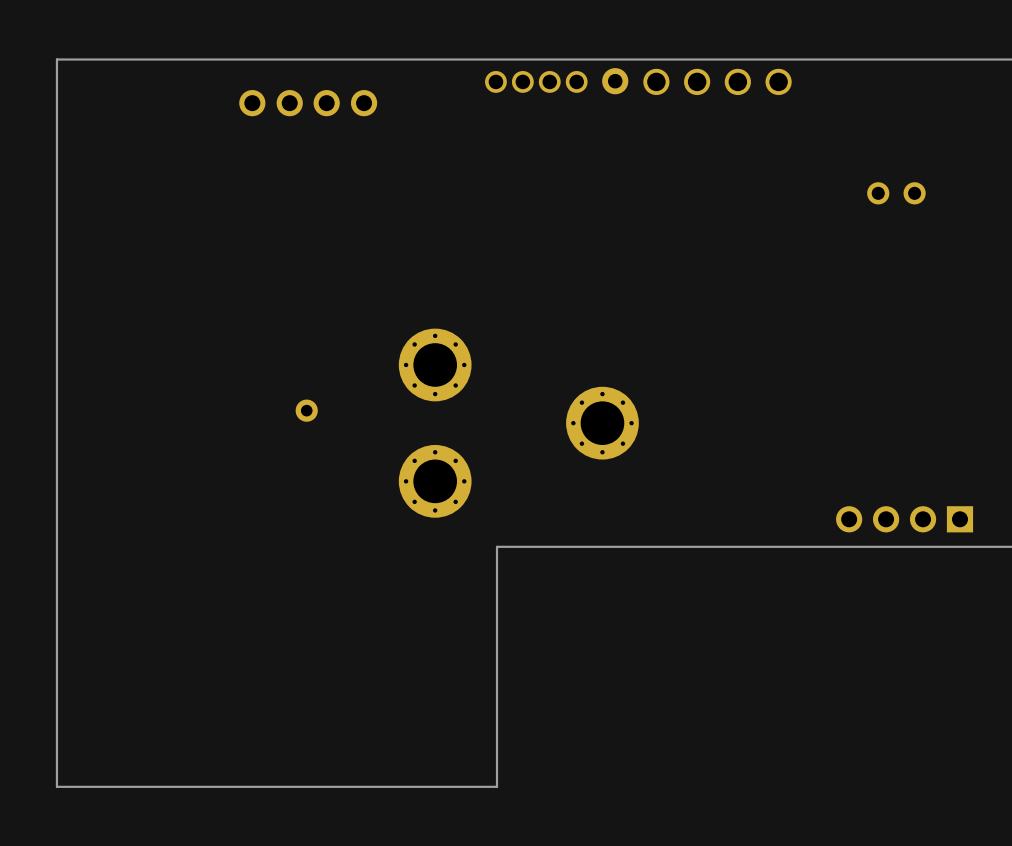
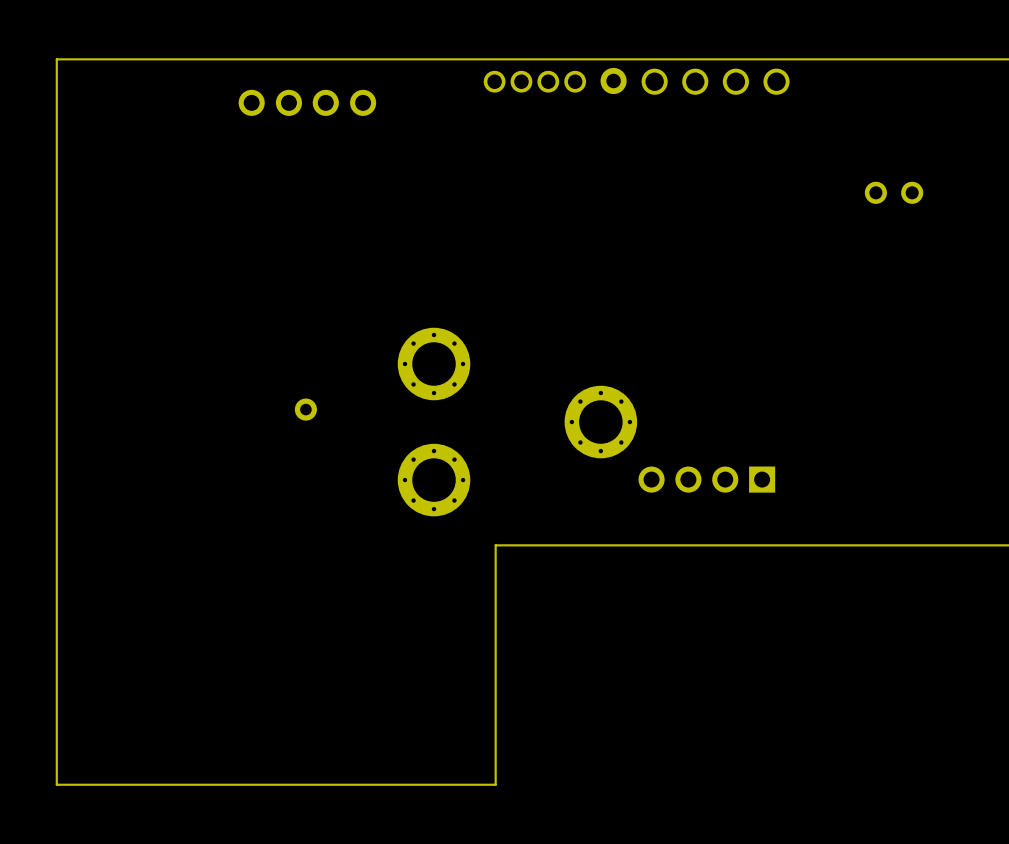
part position: (904, 519) -> (706, 479)

